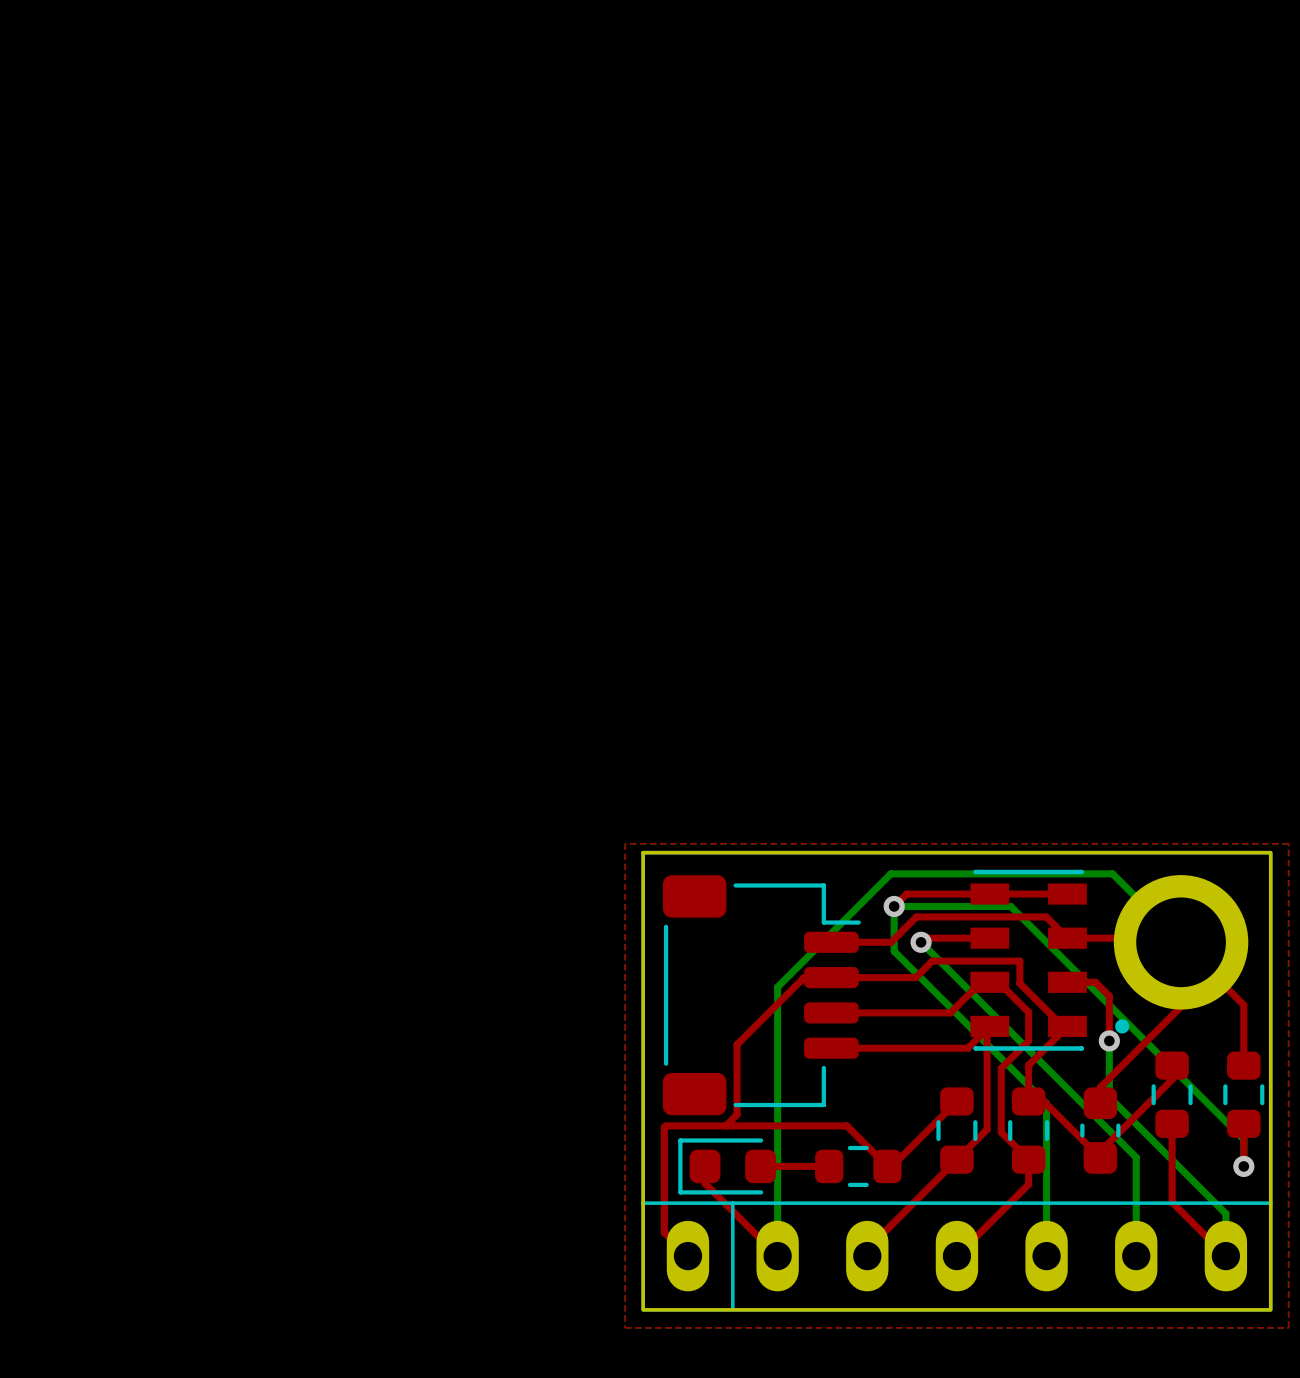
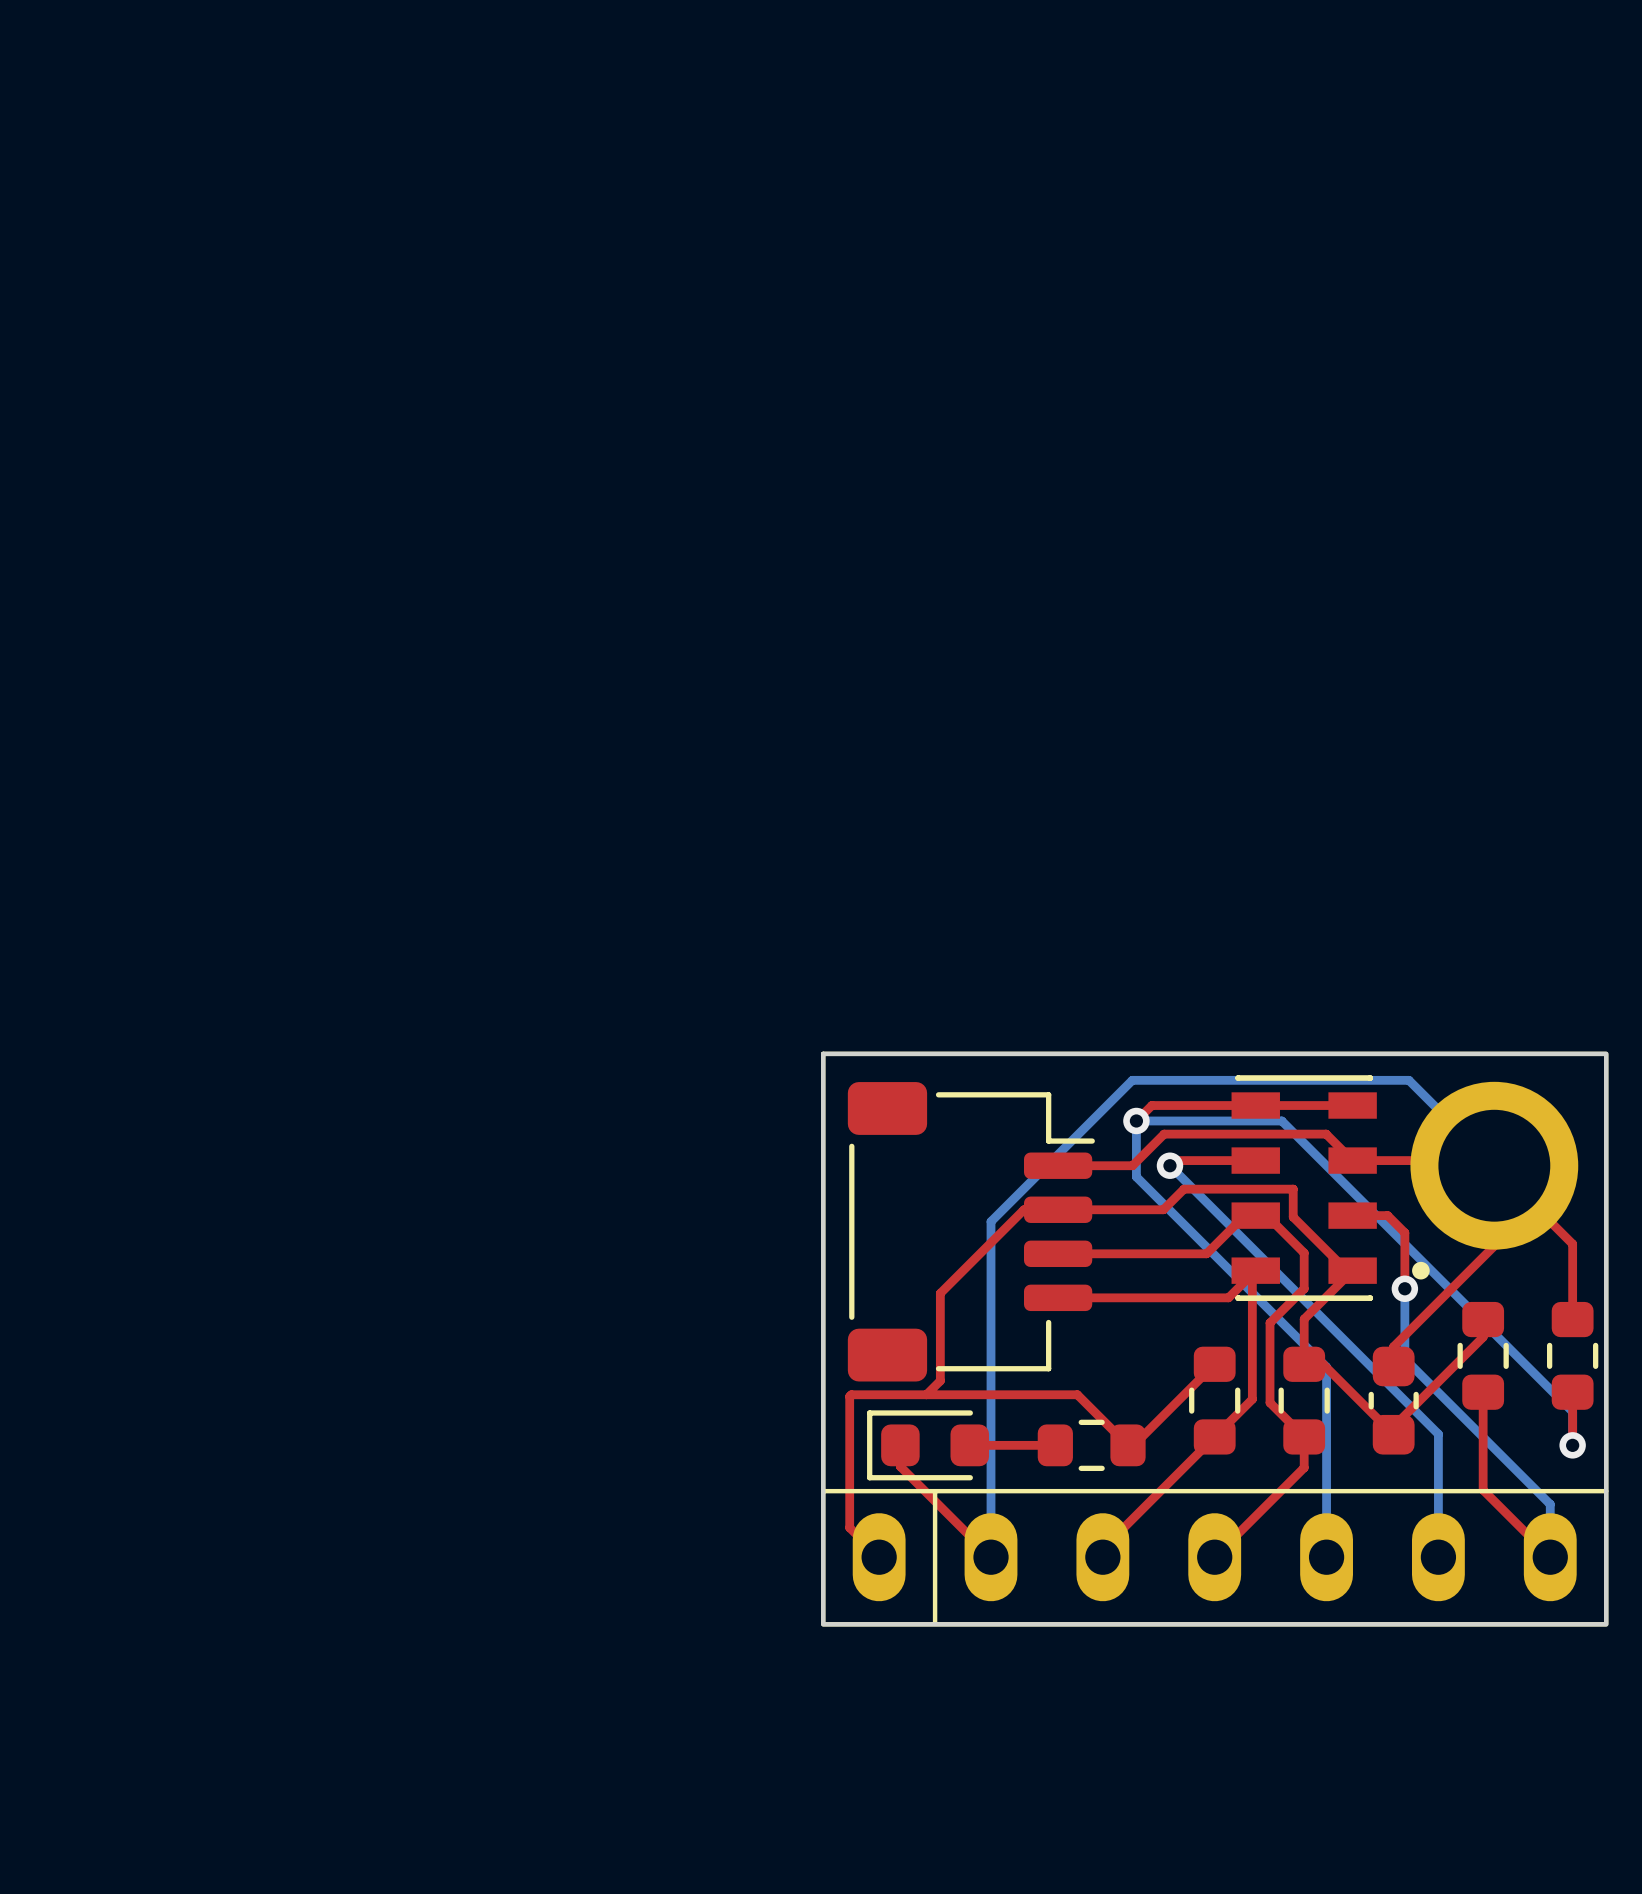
top zone outline: (625, 843) (1288, 843) (1288, 1327) (625, 1327) (625, 843) -> none

